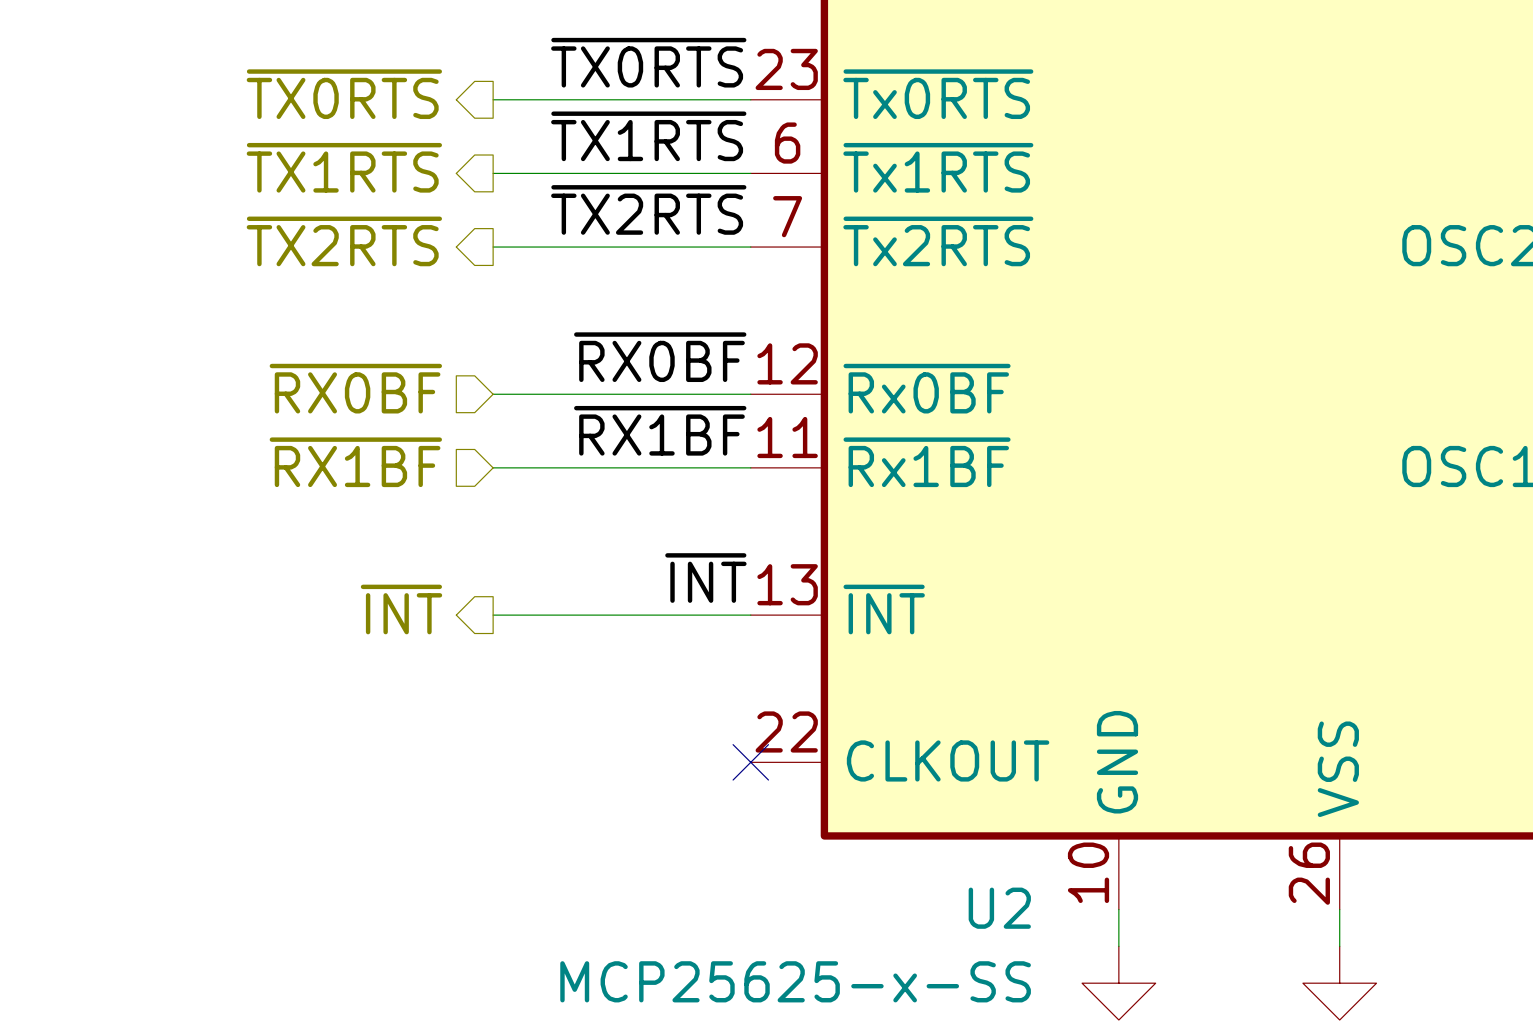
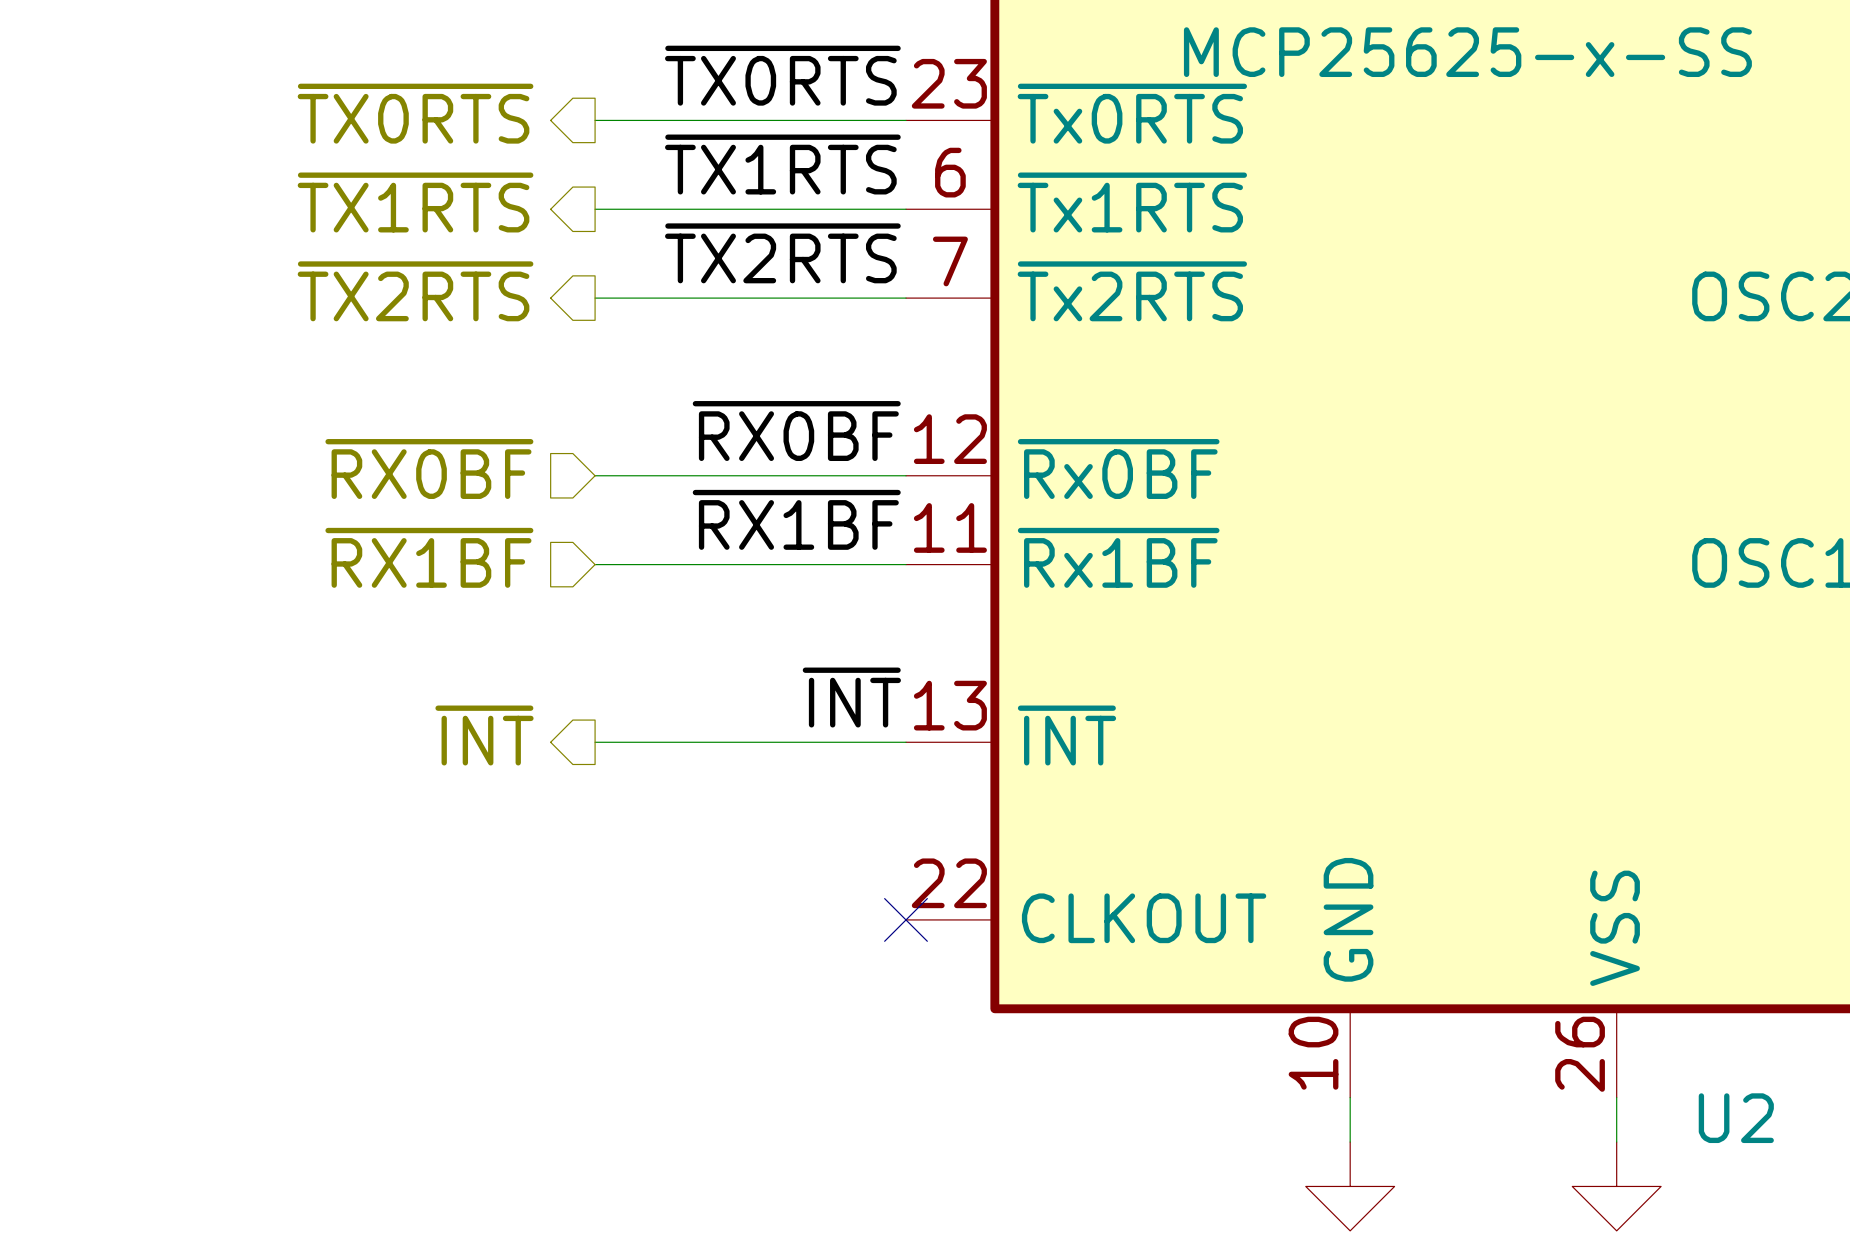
U2 name position: U2 (999, 908) -> U2 (1736, 1118)
U2 value position: MCP25625-x-SS (795, 981) -> MCP25625-x-SS (1467, 52)

